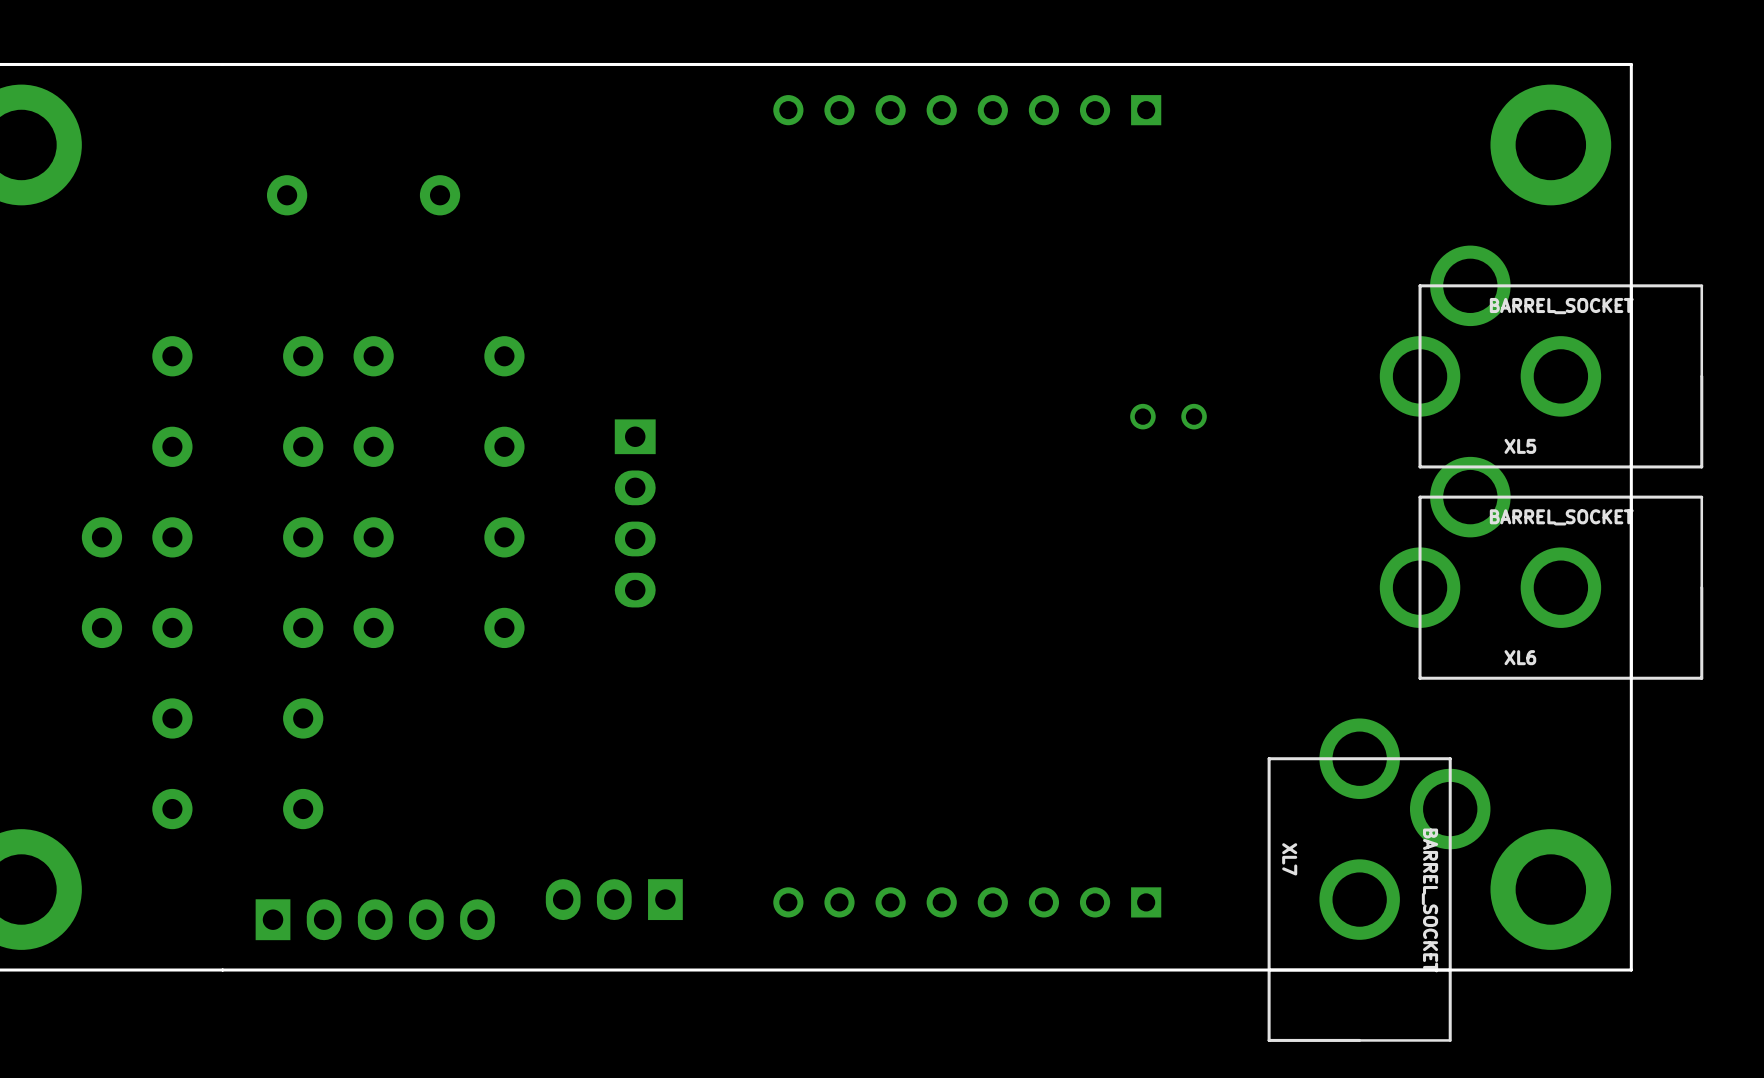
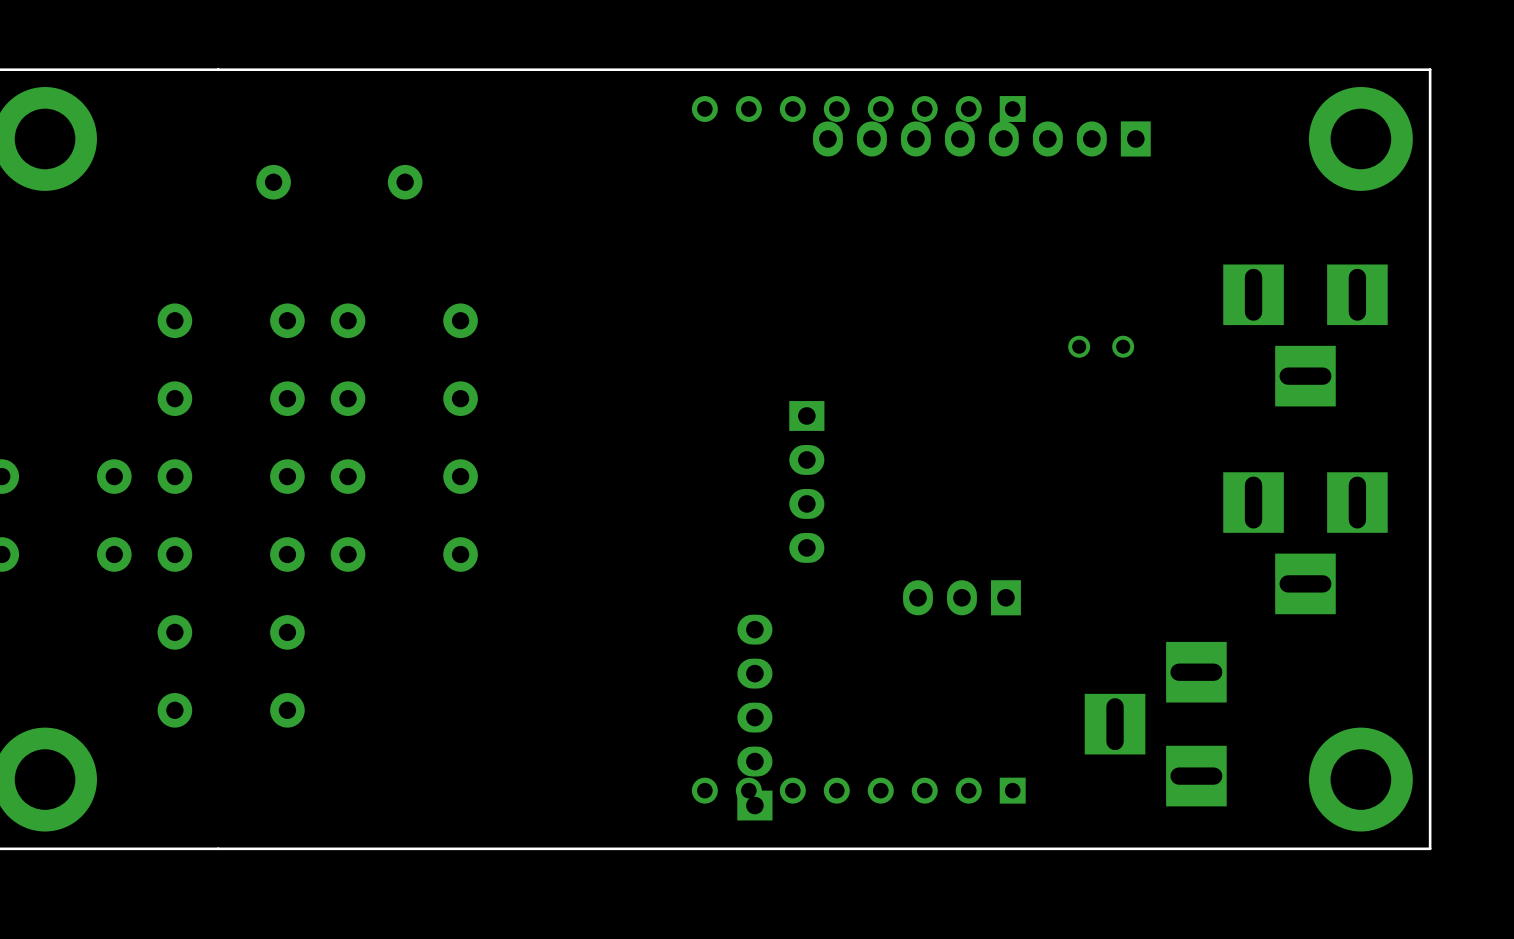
part: none -> (981, 138)
XL5: BARREL_SOCKET (1541, 357) -> none
part: none -> (1305, 335)
part position: (1168, 416) -> (1101, 346)
part position: (635, 513) -> (806, 481)
XL6: BARREL_SOCKET (1541, 568) -> none
part: none -> (1305, 543)
part: none -> (961, 597)
part: none -> (1155, 724)
XL7: BARREL_SOCKET (1379, 880) -> none
part: (614, 899) -> none
part rotation: 0° (375, 919) -> 90° counterclockwise (754, 717)
part position: (375, 919) -> (754, 717)

